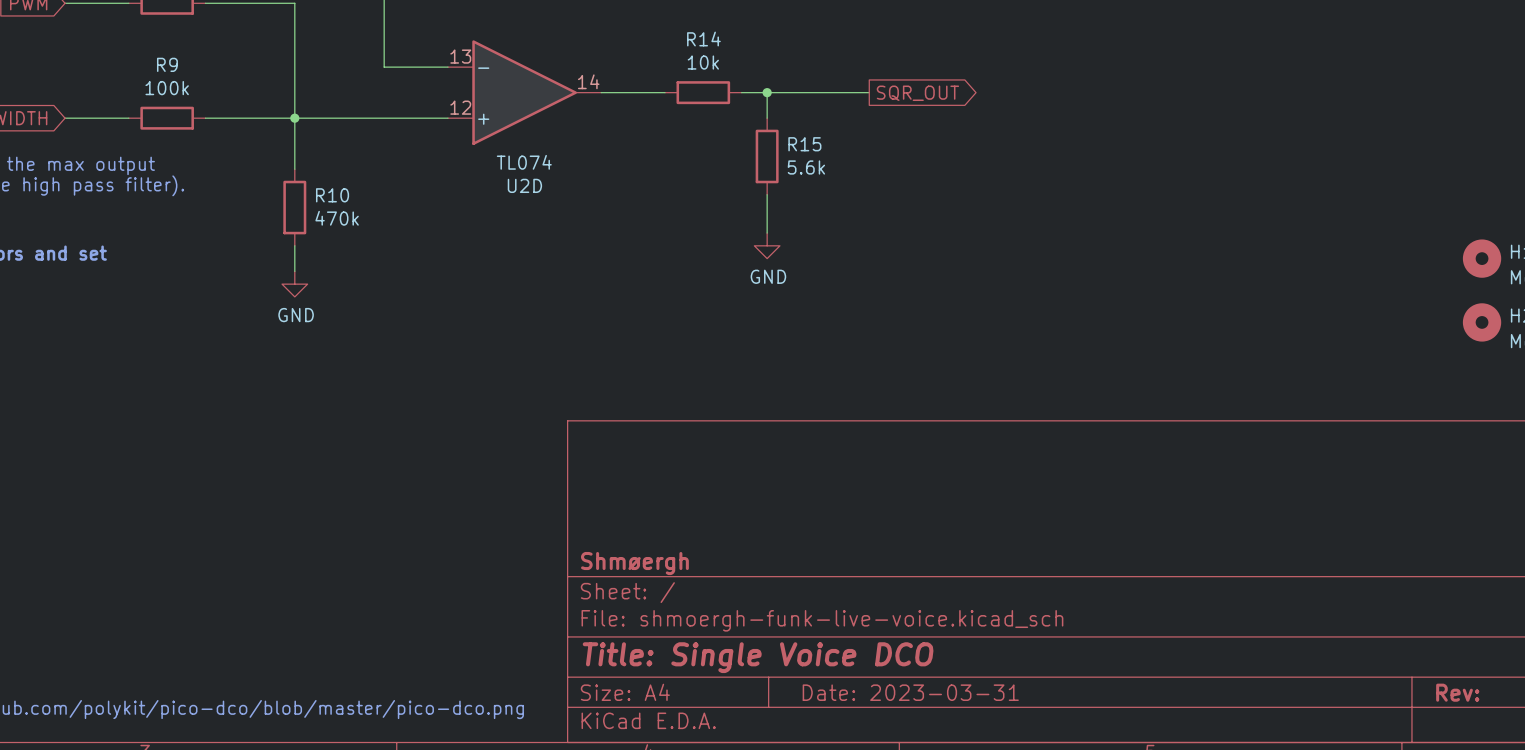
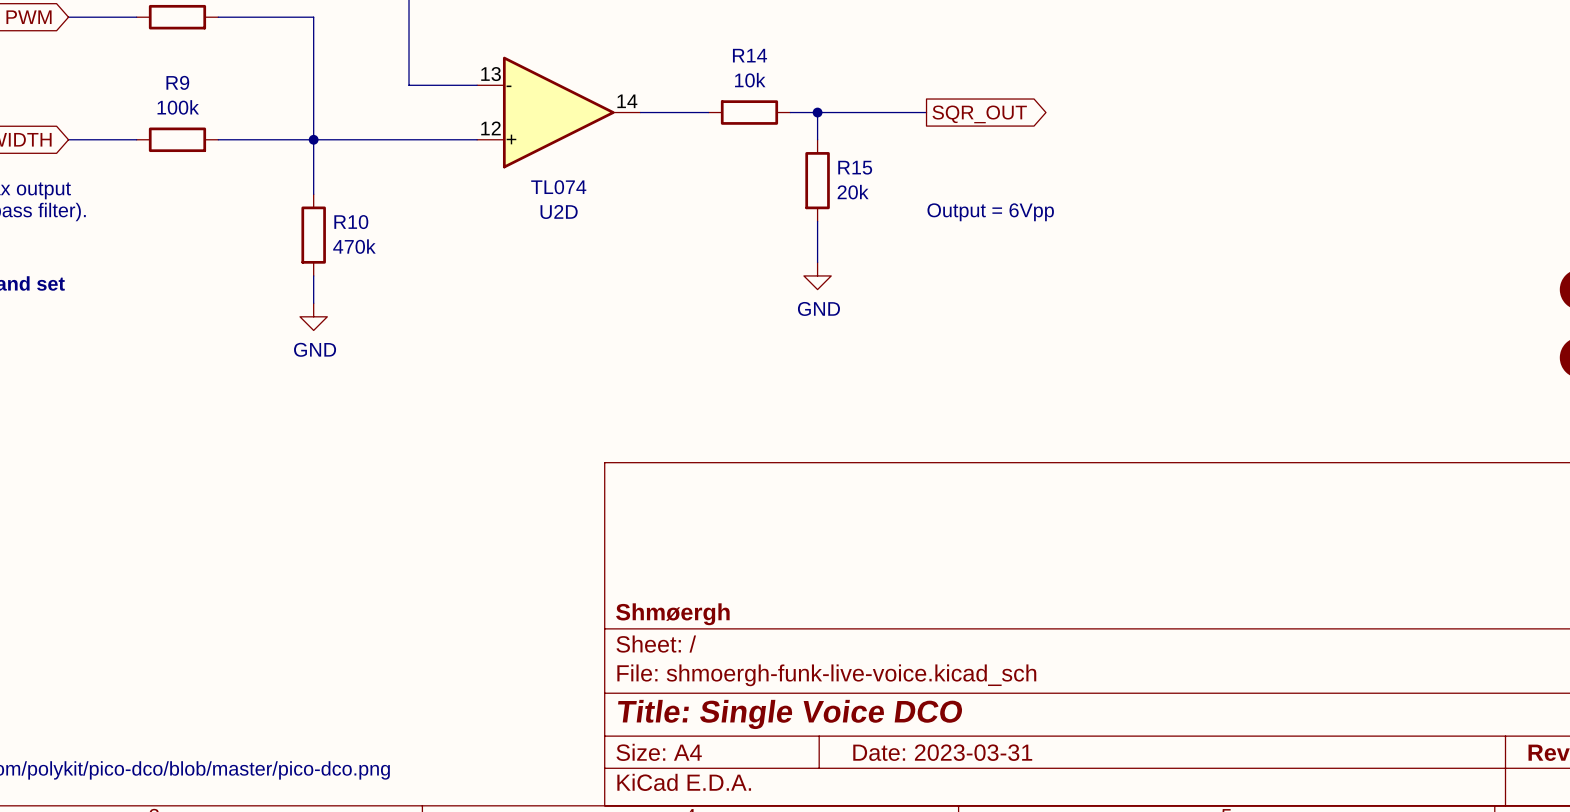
R15 value: 5.6k (806, 167) -> 20k (853, 192)
text: none -> Output = 6Vpp (990, 212)

